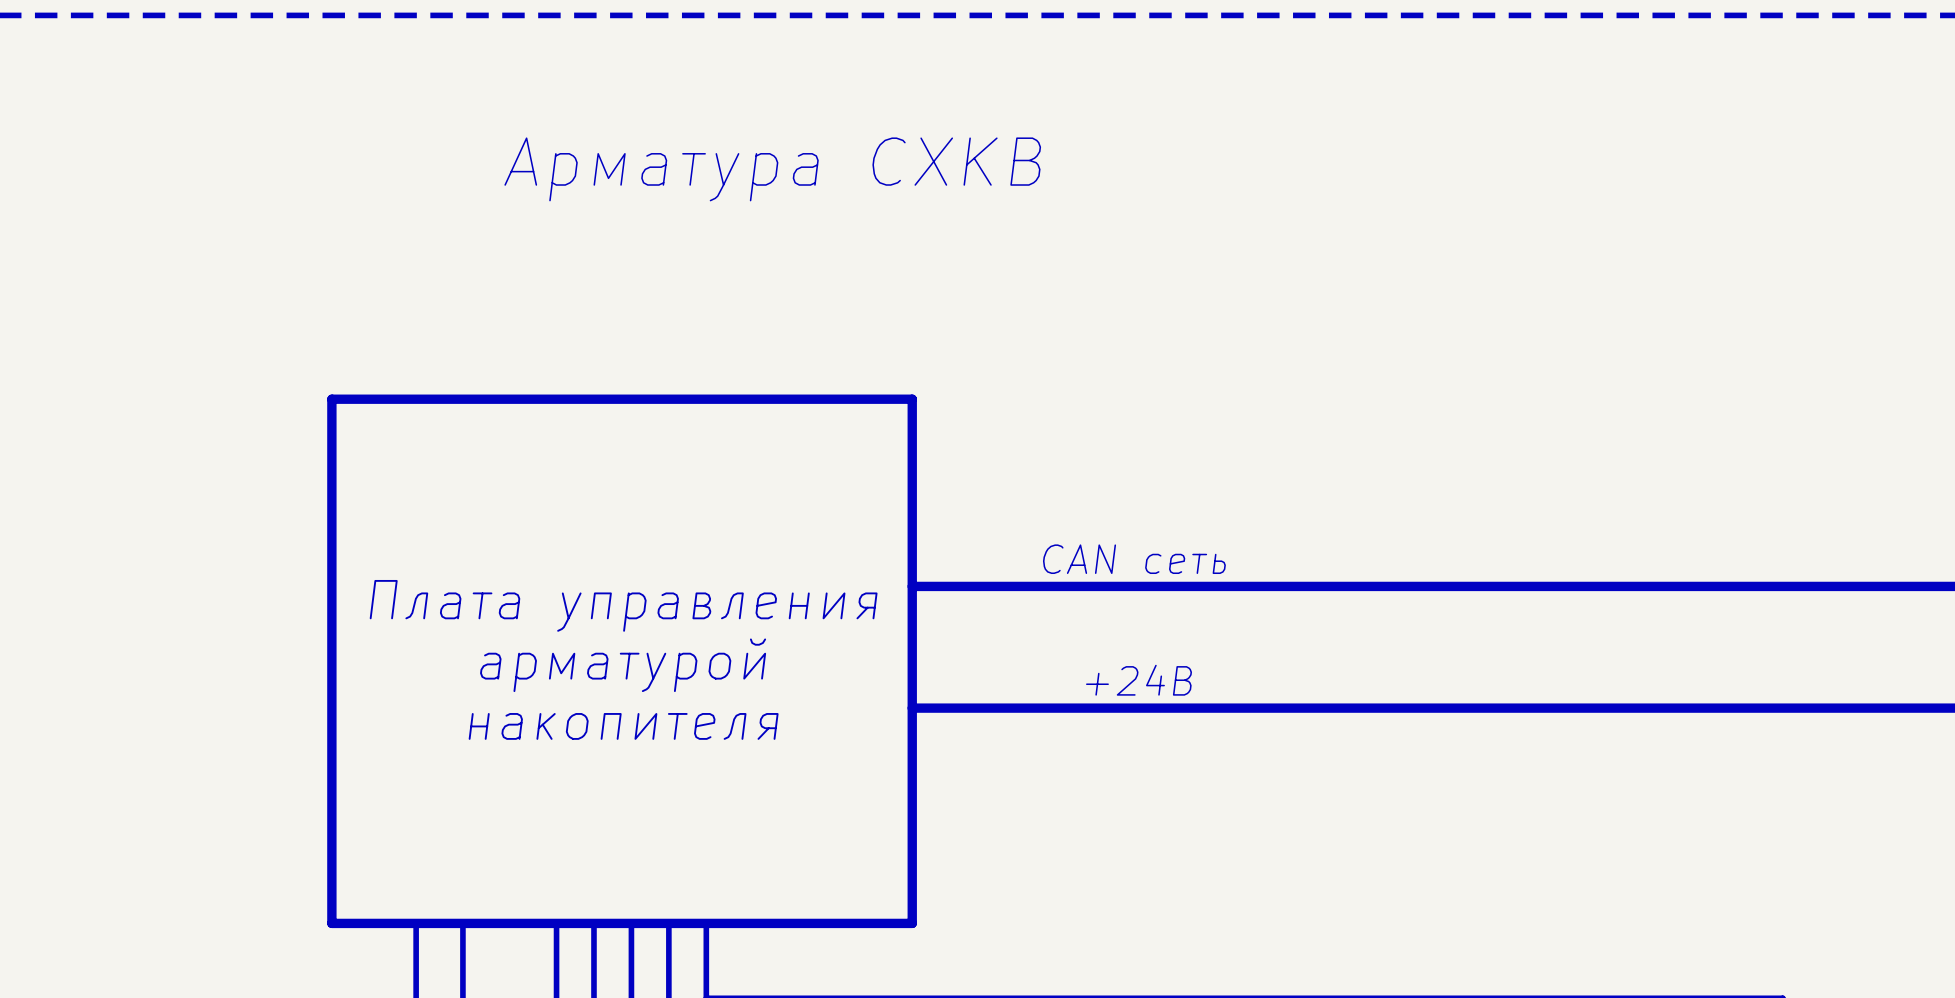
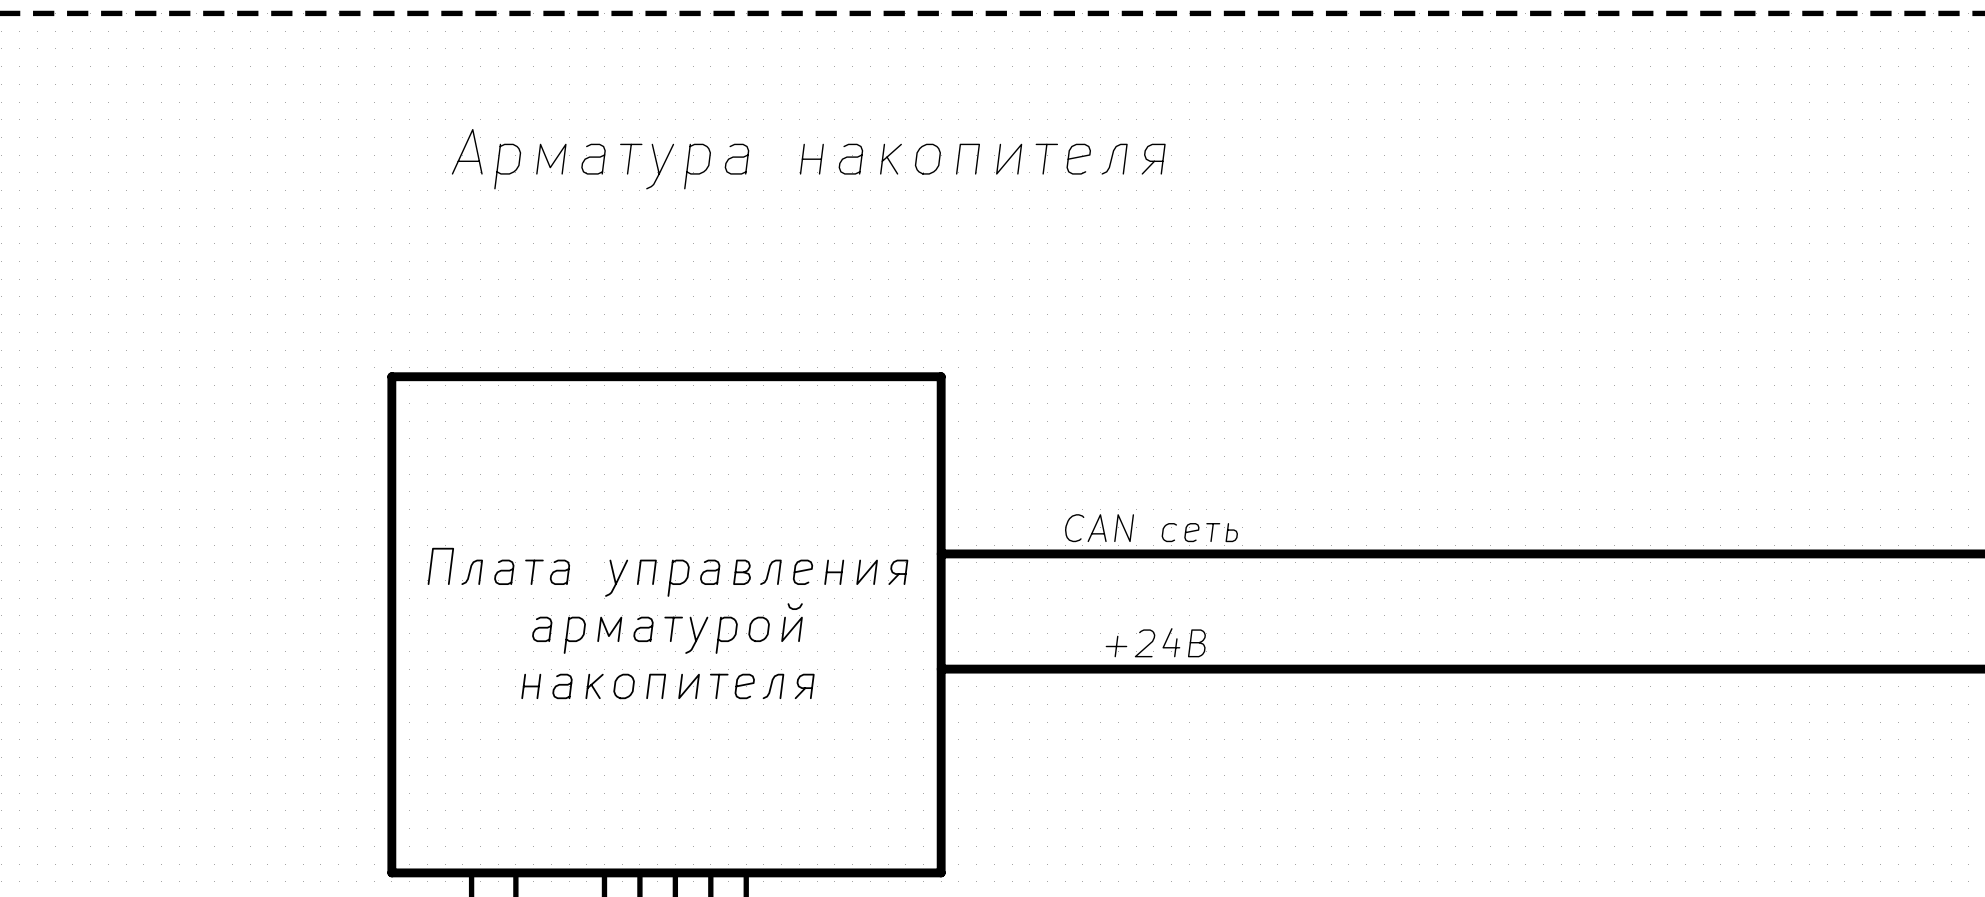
text: Арматура СХКВ (772, 169) -> Арматура накопителя (808, 159)

